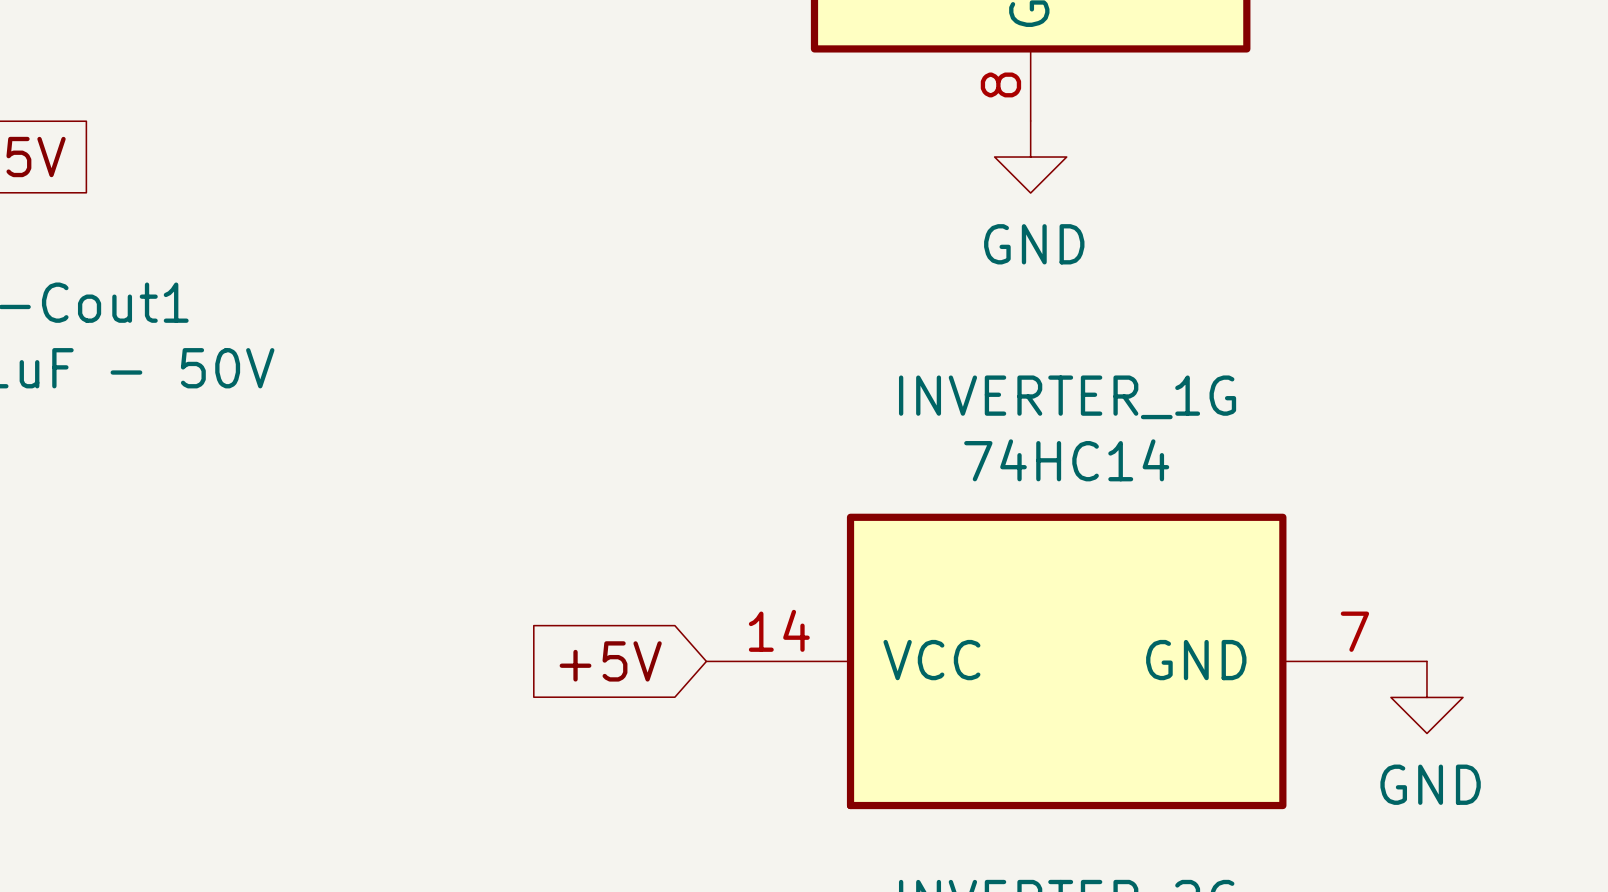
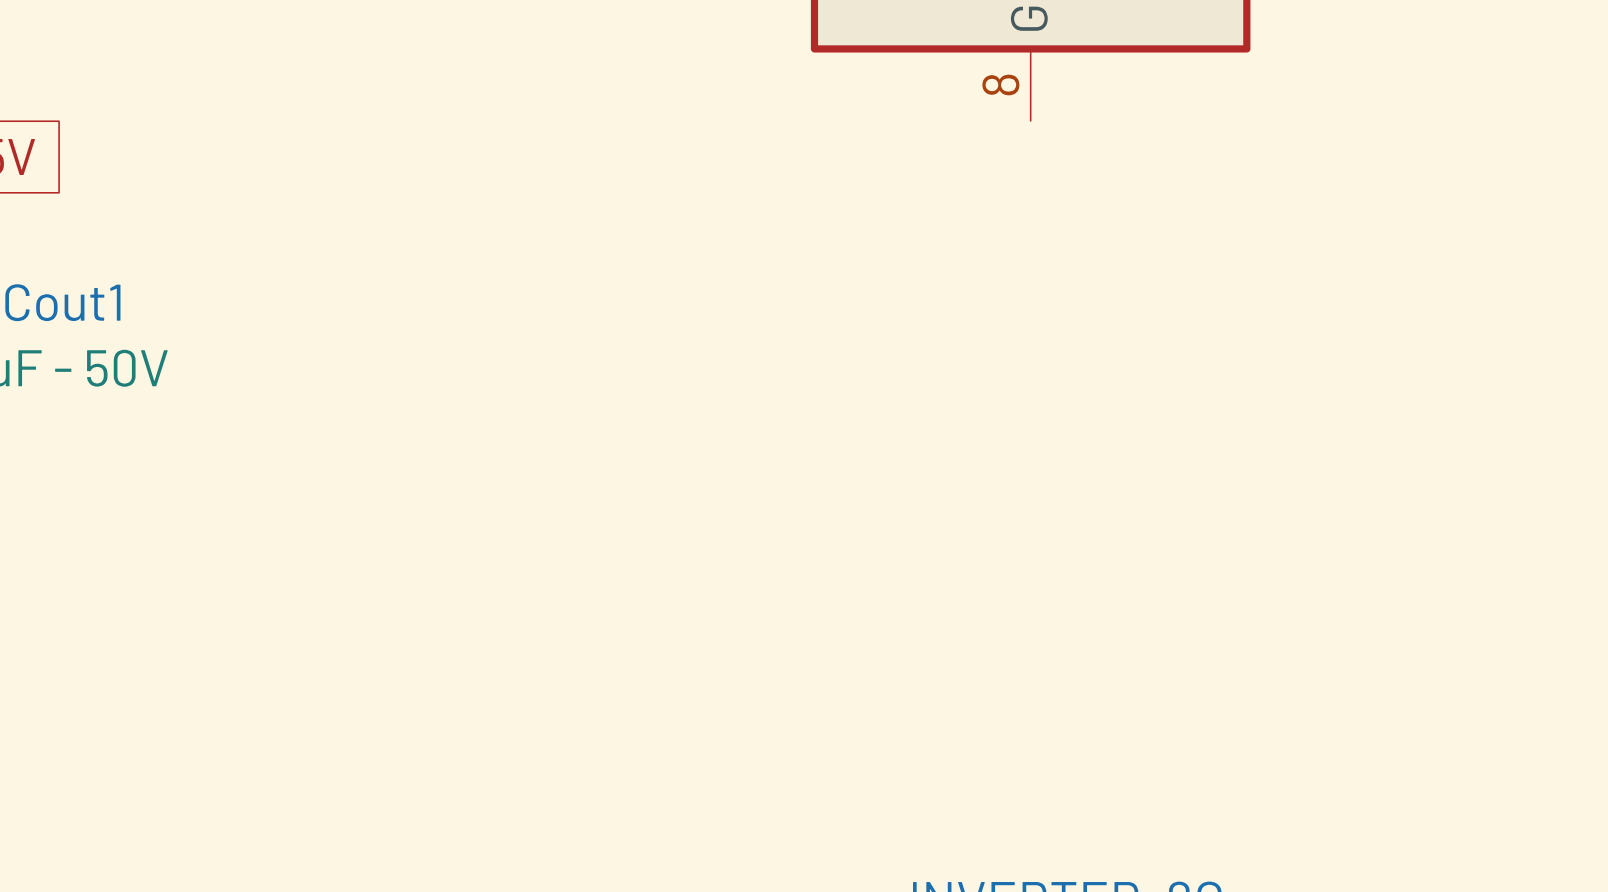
power symbol: GND (1030, 157) -> none
global label: +5V (610, 661) -> none
INVERTER_1G: 74HC14 (1066, 661) -> none
power symbol: GND (1426, 697) -> none

